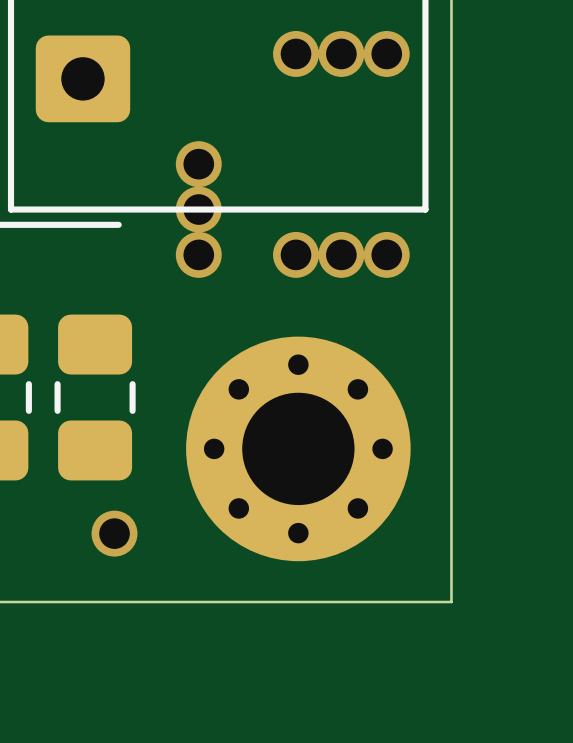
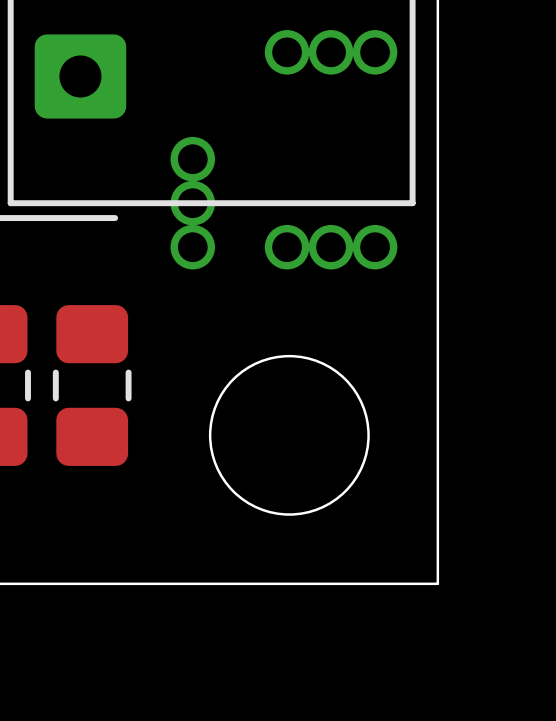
round board edge: none -> [208, 354, 370, 516]
part: (298, 448) -> none
via: (114, 533) -> none

